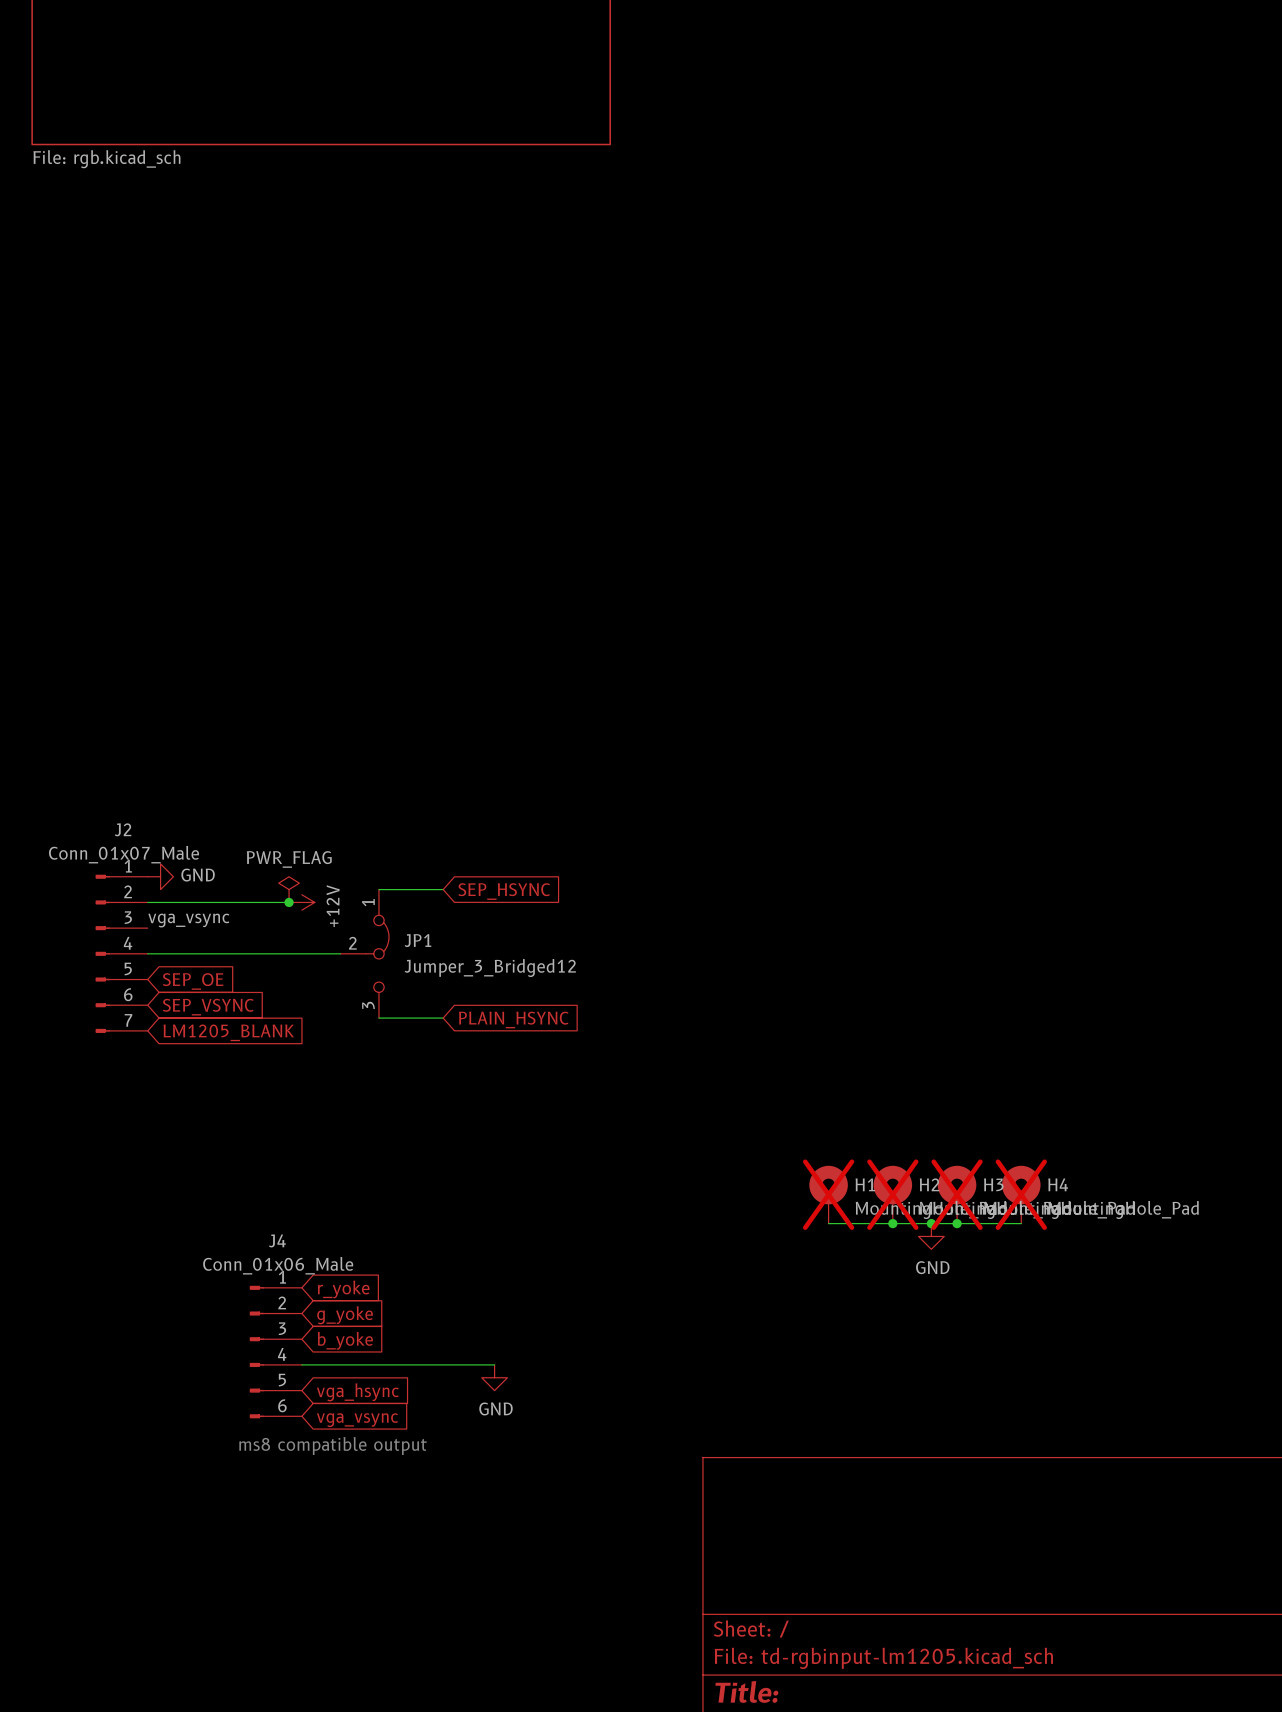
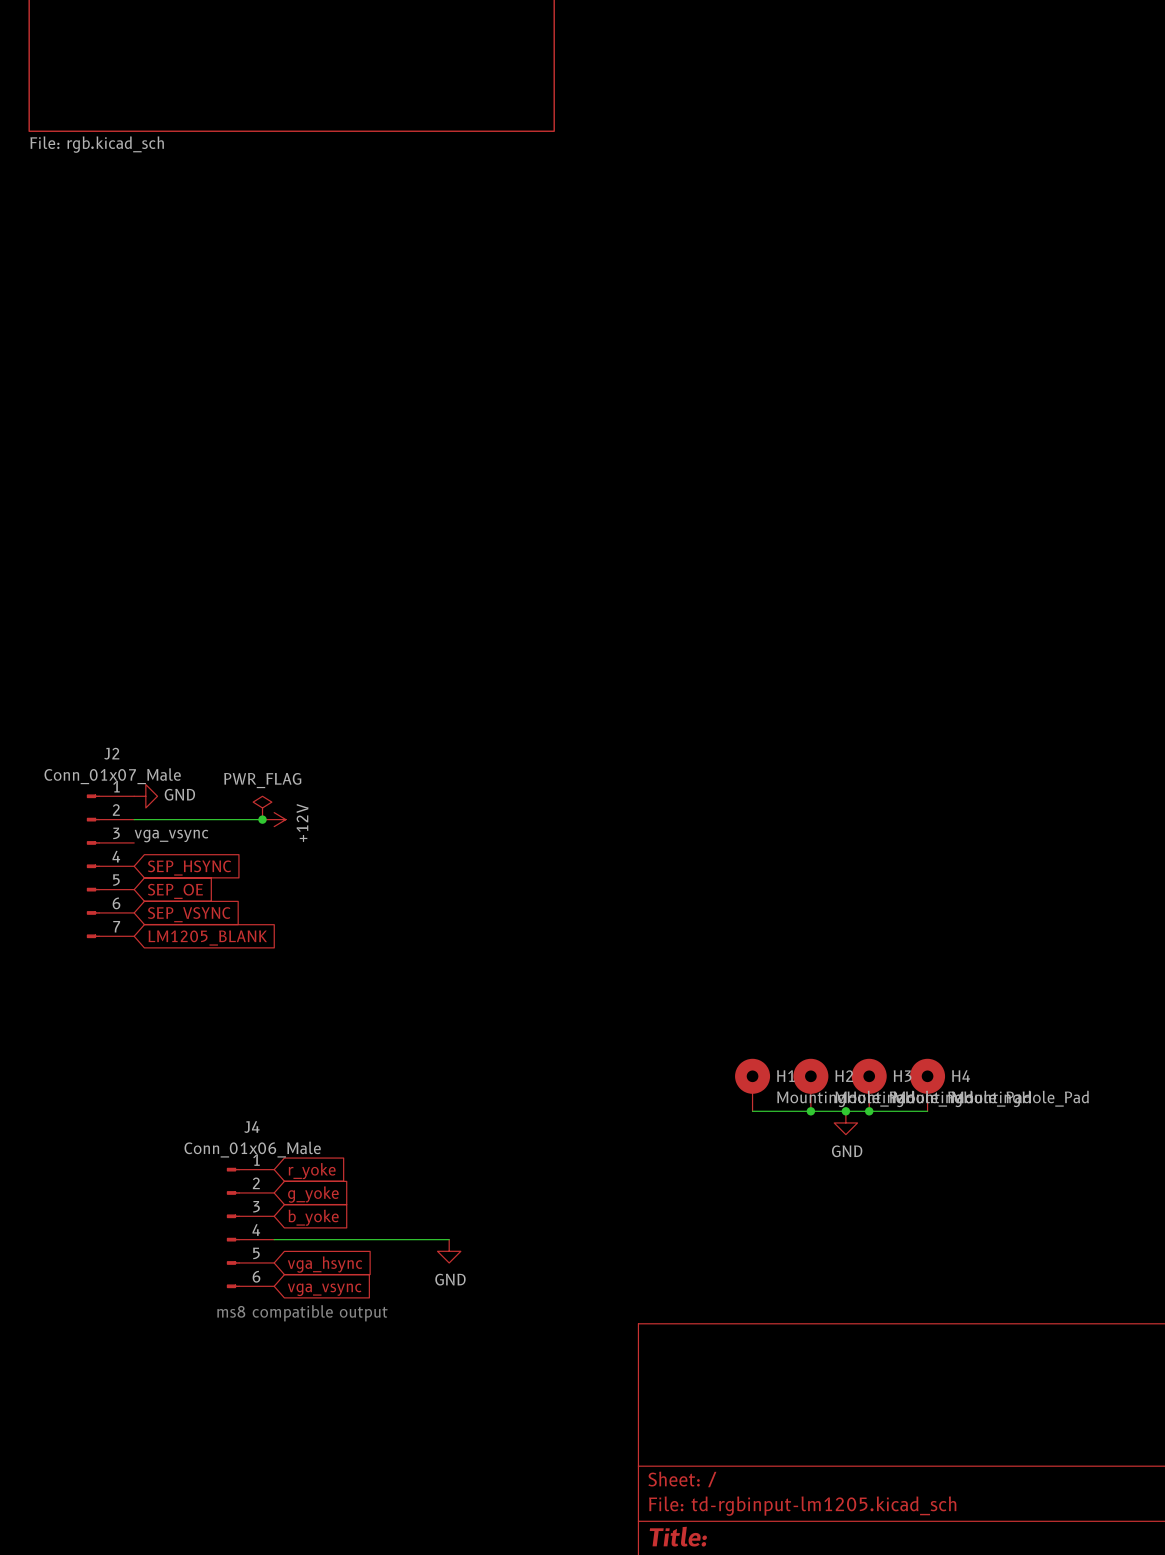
wire: (378, 889) (443, 889) -> none
global label: SEP_HSYNC (504, 891) -> none
wire: (147, 953) (340, 953) -> none
JP1: Jumper_3_Bridged12 (364, 953) -> none
global label: none -> SEP_HSYNC (189, 868)
wire: (378, 1018) (443, 1018) -> none
global label: PLAIN_HSYNC (513, 1019) -> none
H1 do-not-place cross: (828, 1194) -> none
H2 do-not-place cross: (892, 1194) -> none
H3 do-not-place cross: (957, 1194) -> none
H4 do-not-place cross: (1021, 1194) -> none

